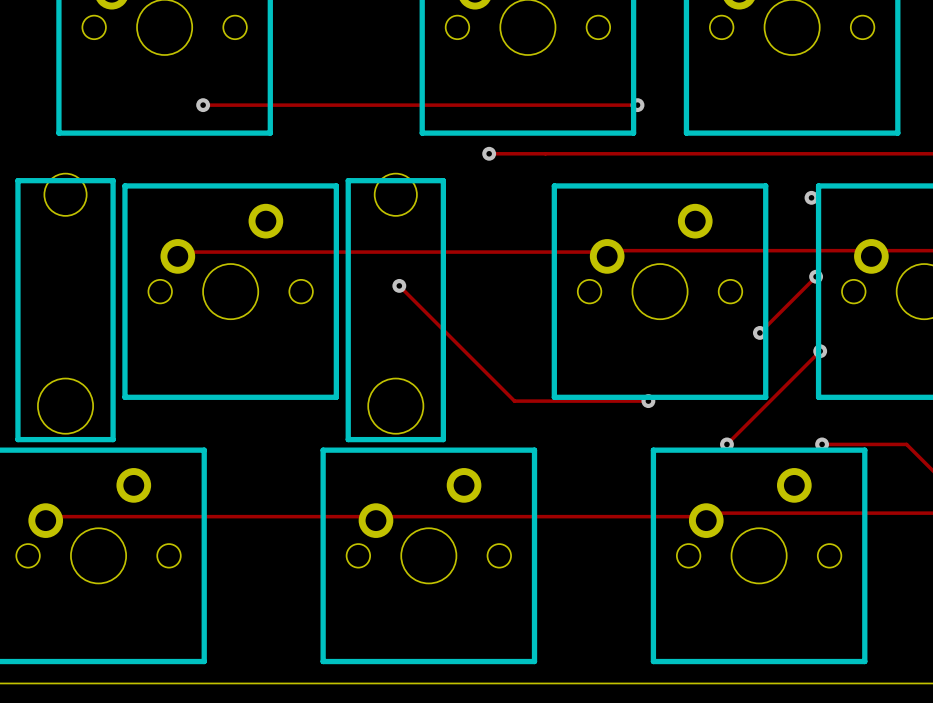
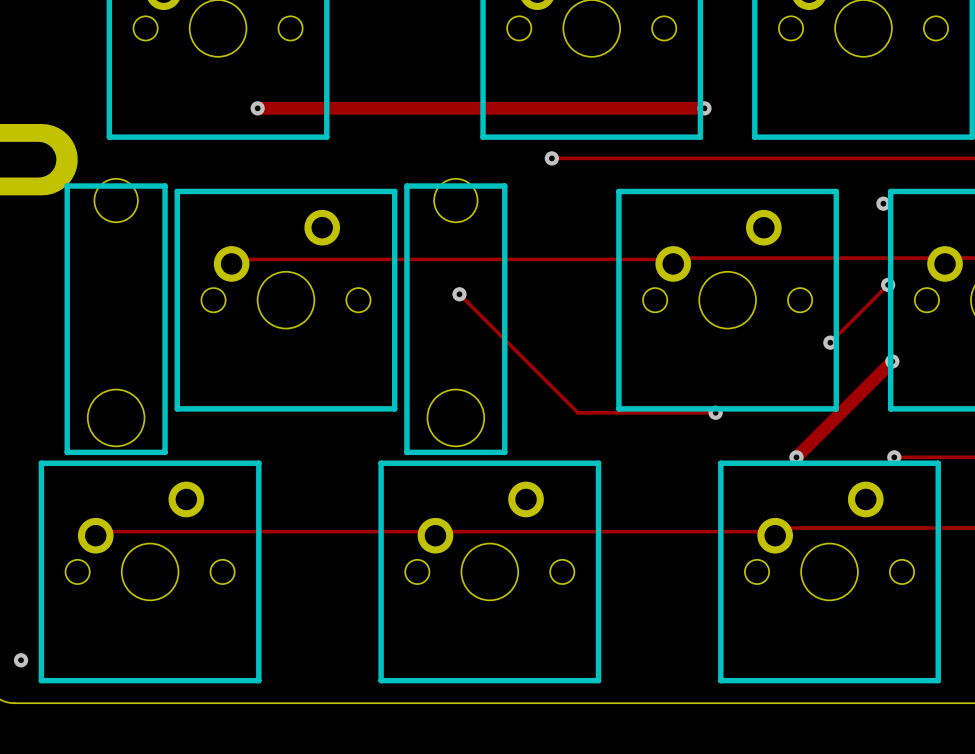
track width: thin (203, 105) (637, 105) -> thick (257, 108) (704, 108)
track width: thin (818, 352) (726, 444) -> thick (890, 363) (796, 457)

